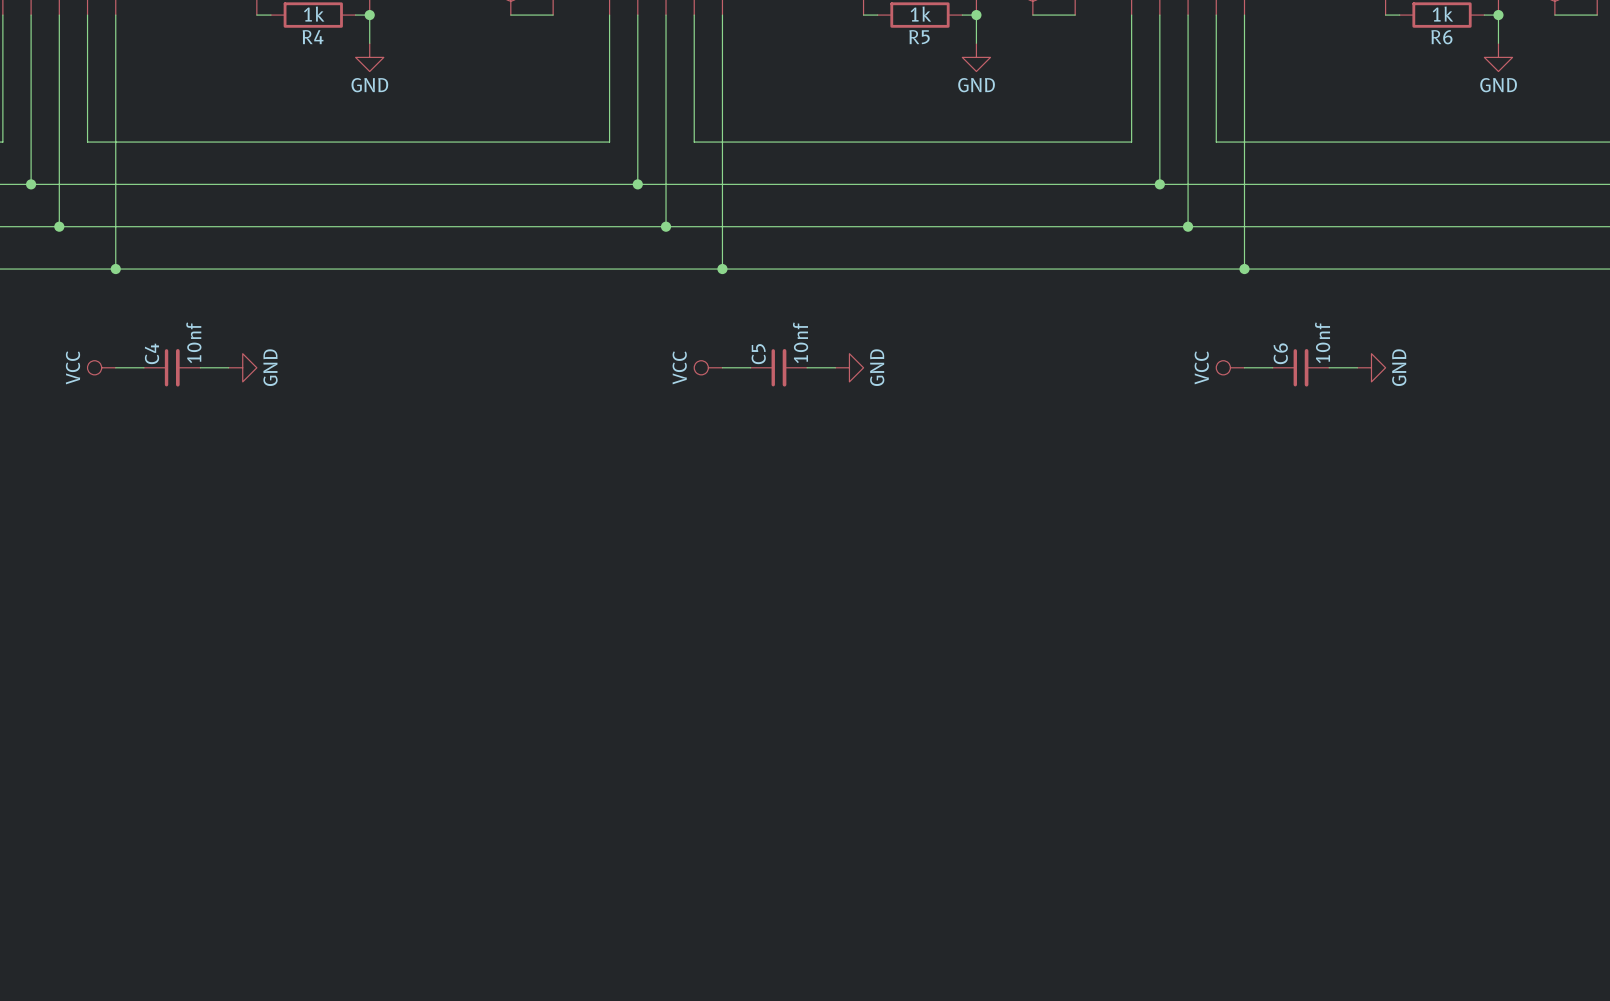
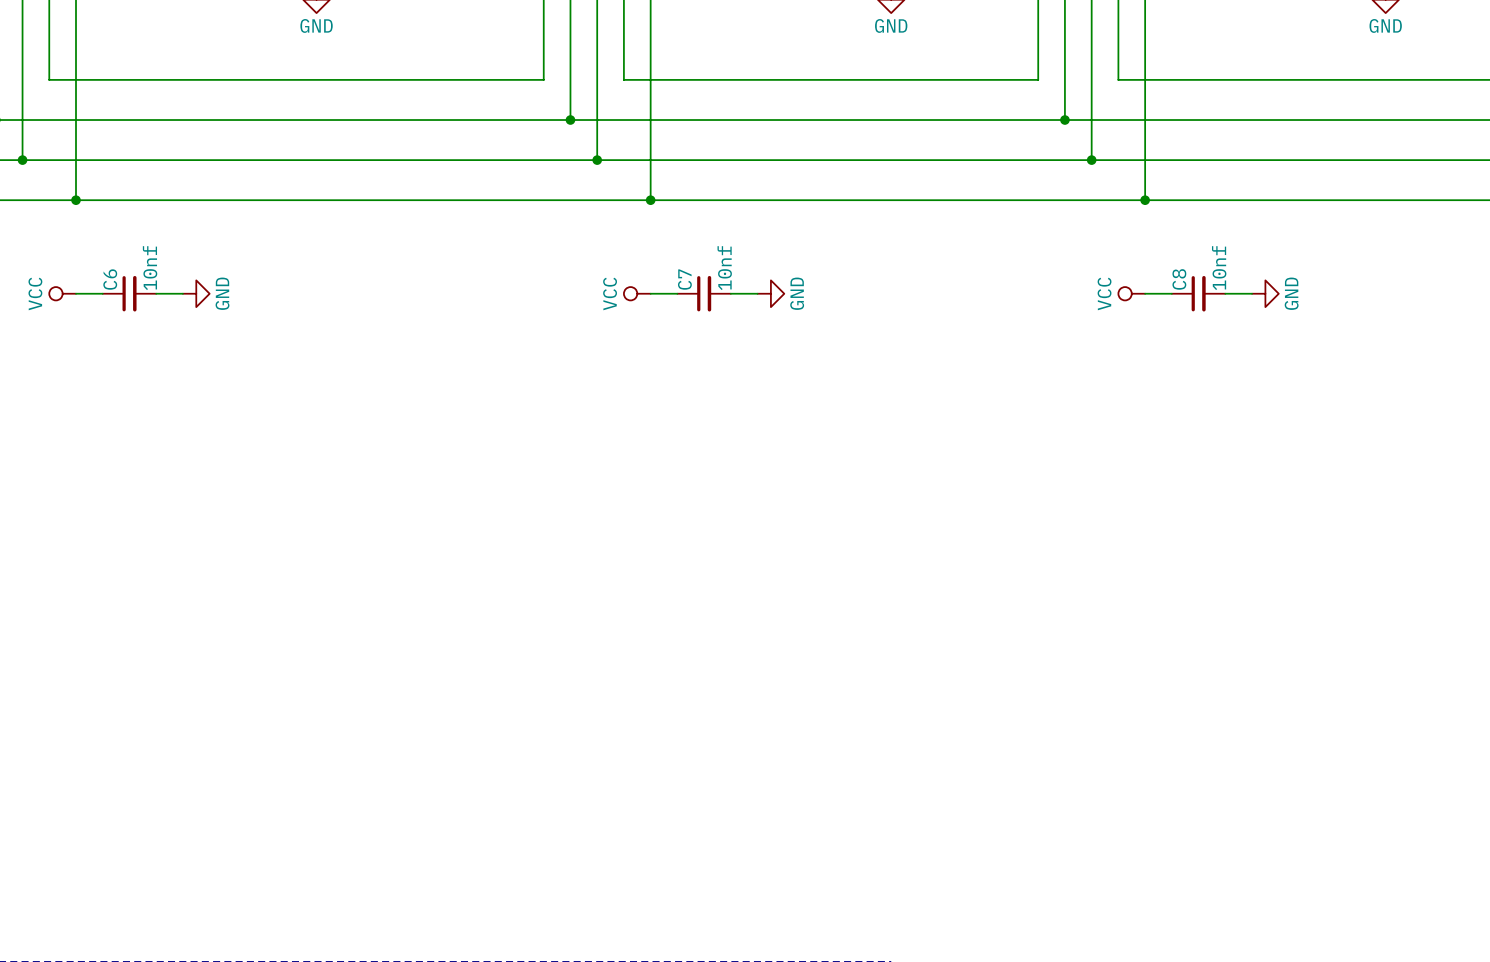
C4 name: C4 (151, 353) -> C6 (110, 279)
C6 name: C6 (1280, 353) -> C8 (1179, 279)
C5 name: C5 (758, 354) -> C7 (684, 279)

